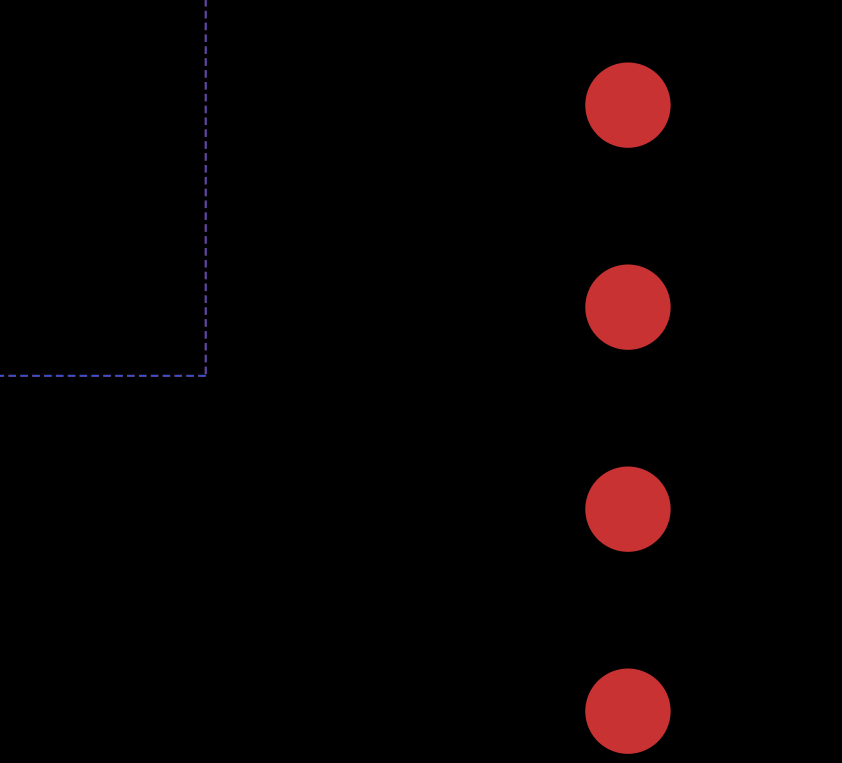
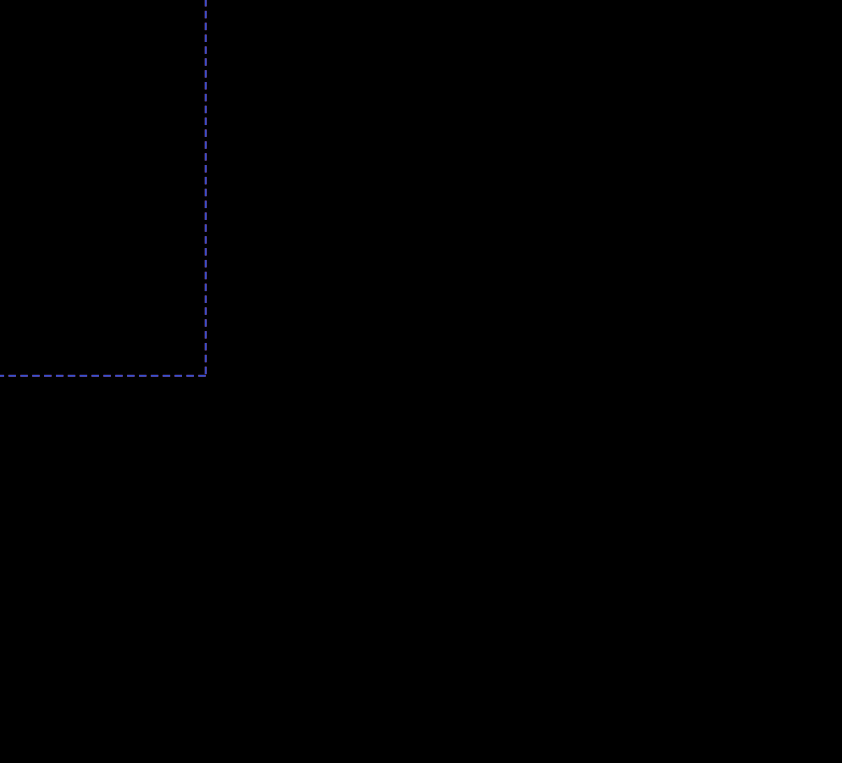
part: (627, 105) -> none
part: (627, 307) -> none
part: (627, 509) -> none
part: (627, 711) -> none

